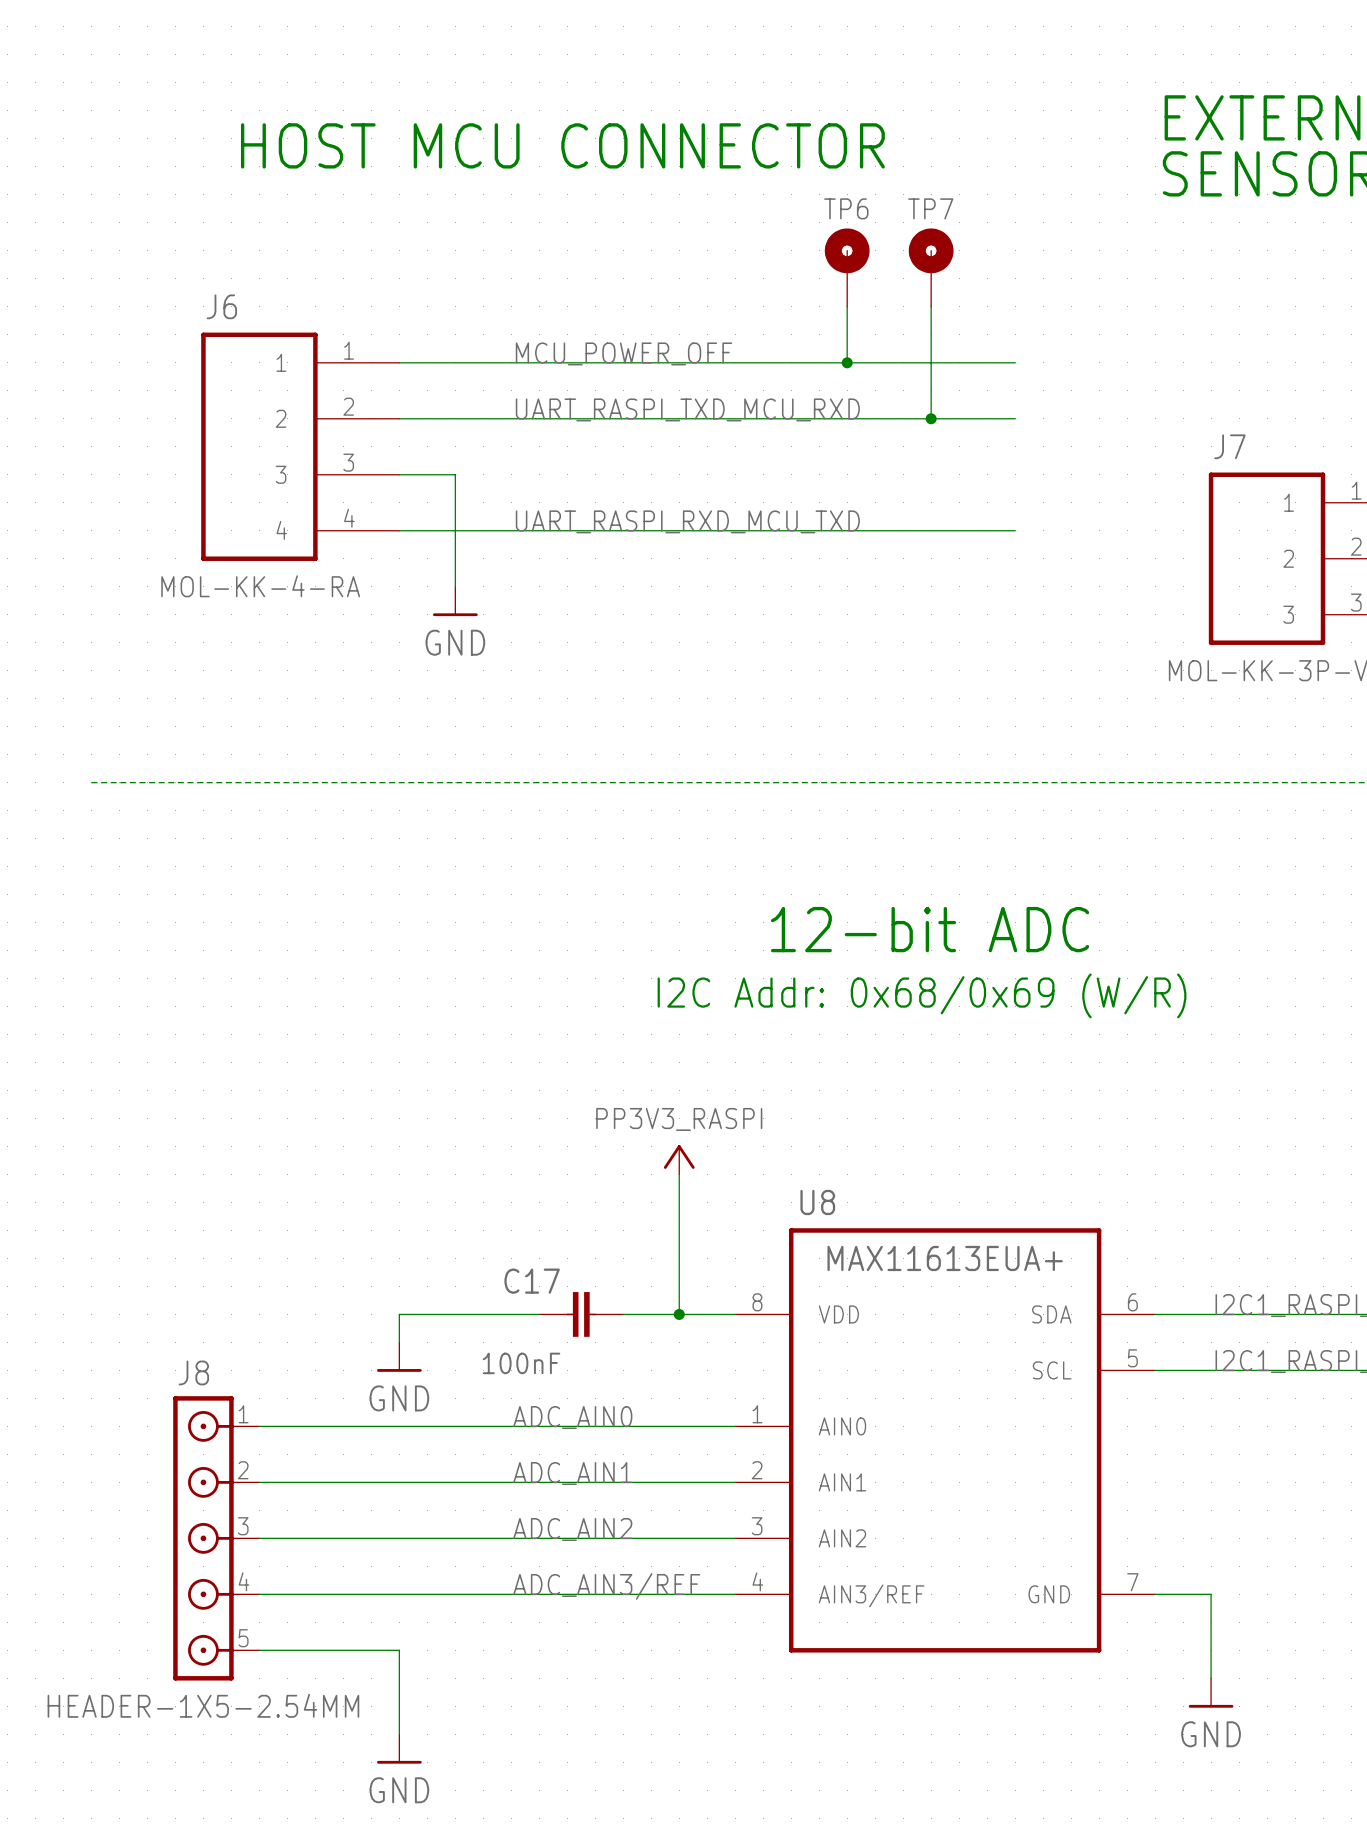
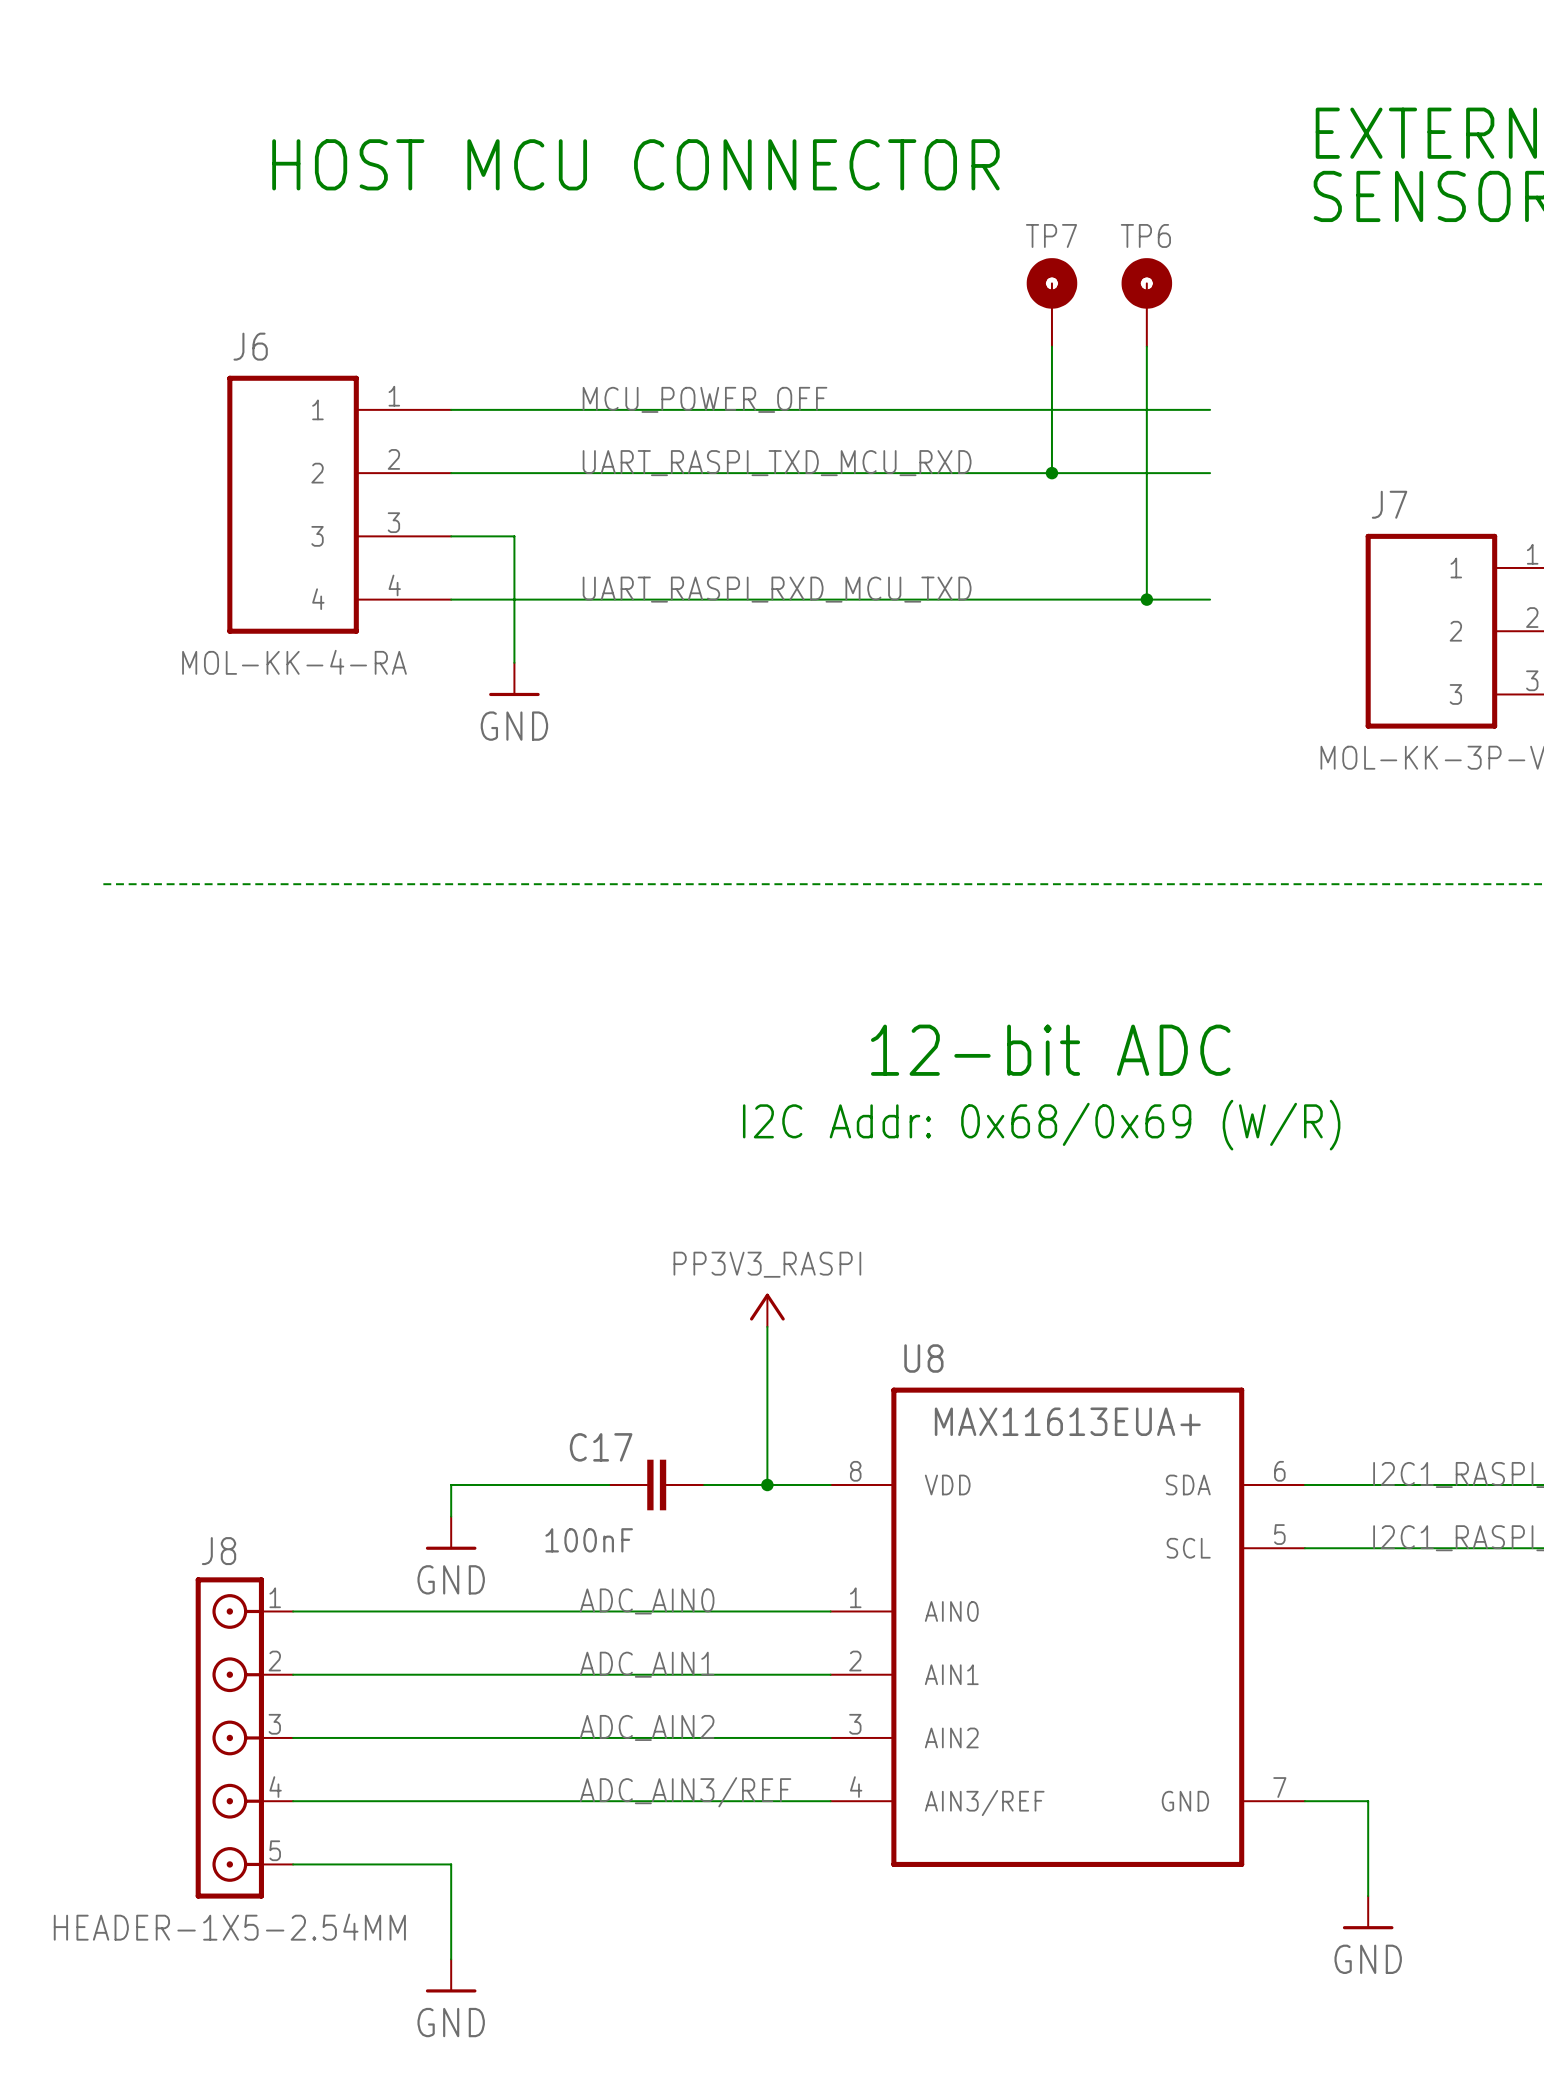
TP6 position: (847, 267) -> (1146, 302)
wire: (847, 306) (847, 362) -> none
wire: none -> (1146, 346) (1146, 599) (1210, 599)
junction: (847, 362) -> none
wire: none -> (1146, 409) (1210, 409)
wire: none -> (1146, 473) (1210, 473)
junction: none -> (1146, 599)

